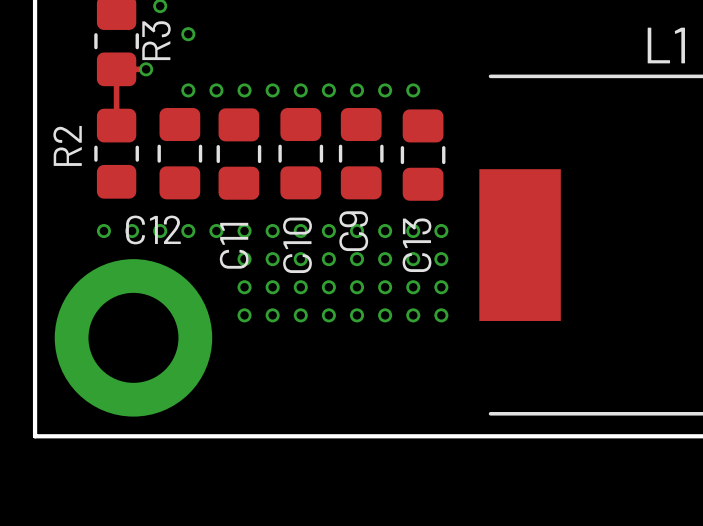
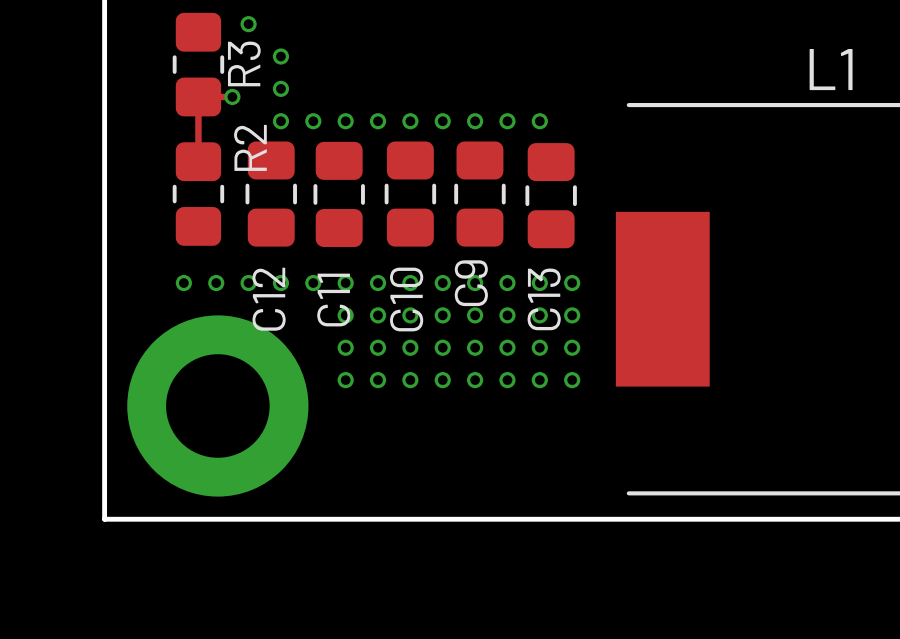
via: none -> (280, 88)
R2 name position: R2 (67, 145) -> R2 (250, 147)
C12 name rotation: 0° (153, 229) -> 90° counterclockwise (269, 299)

